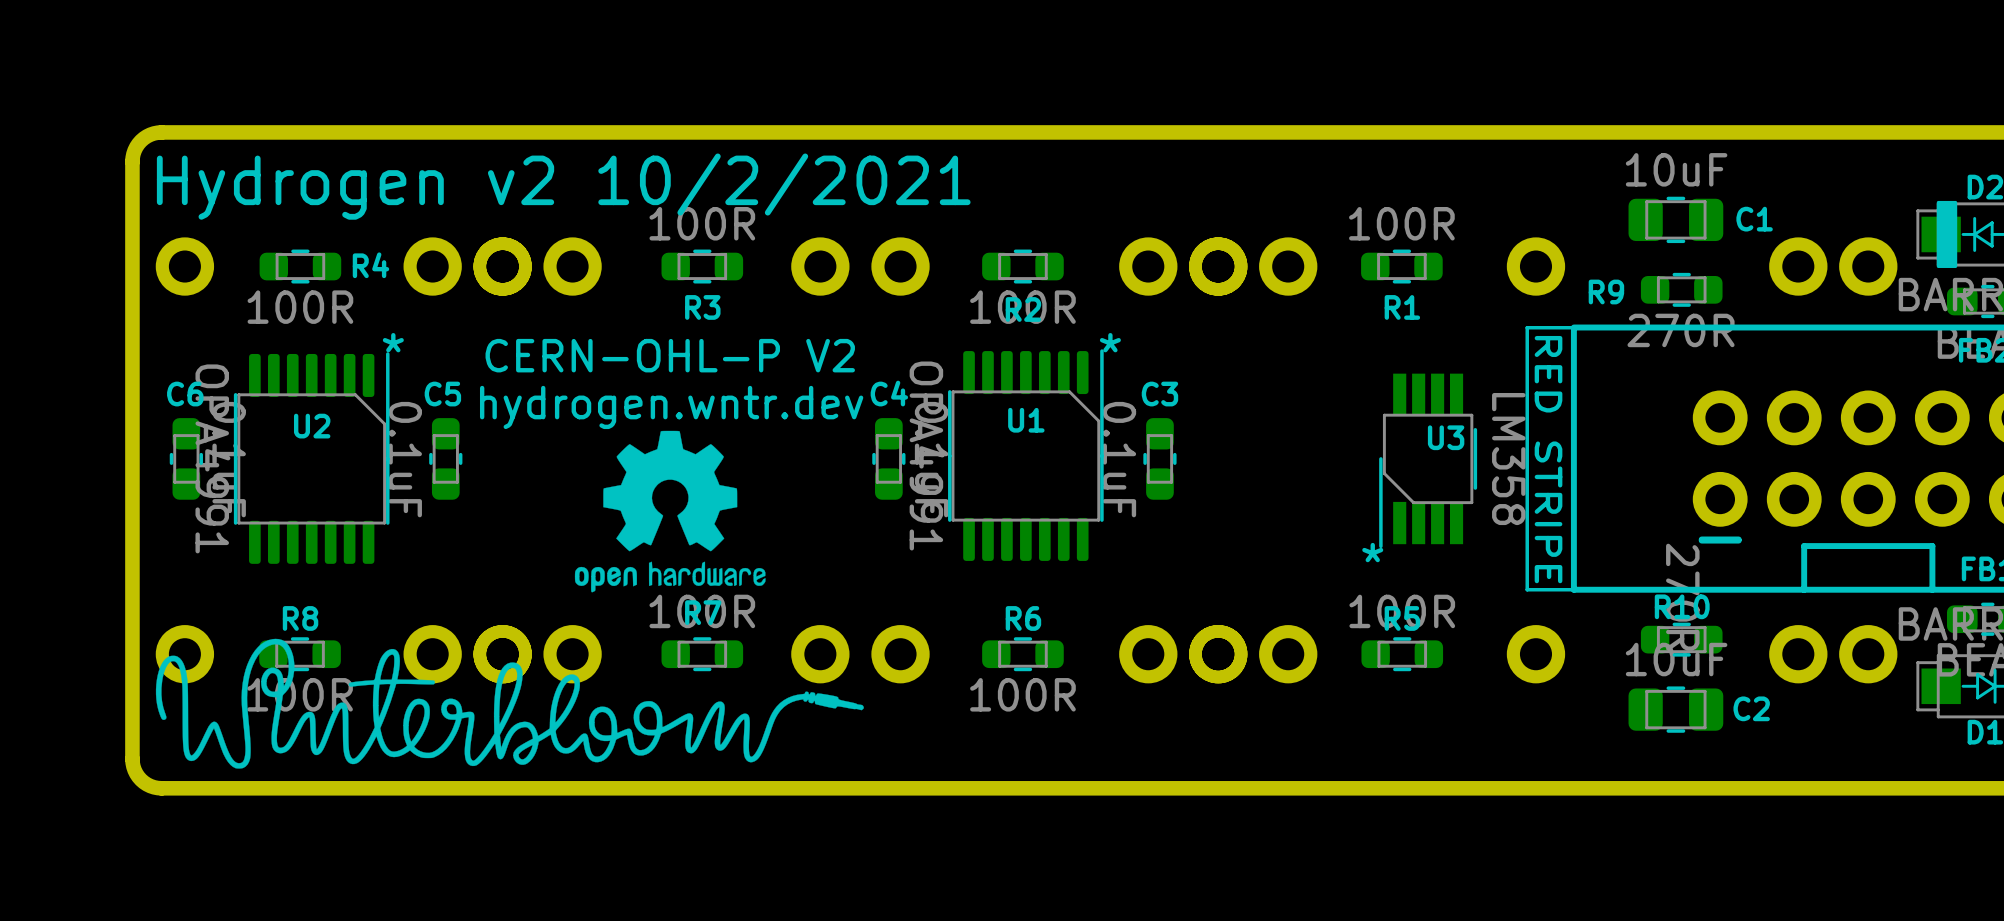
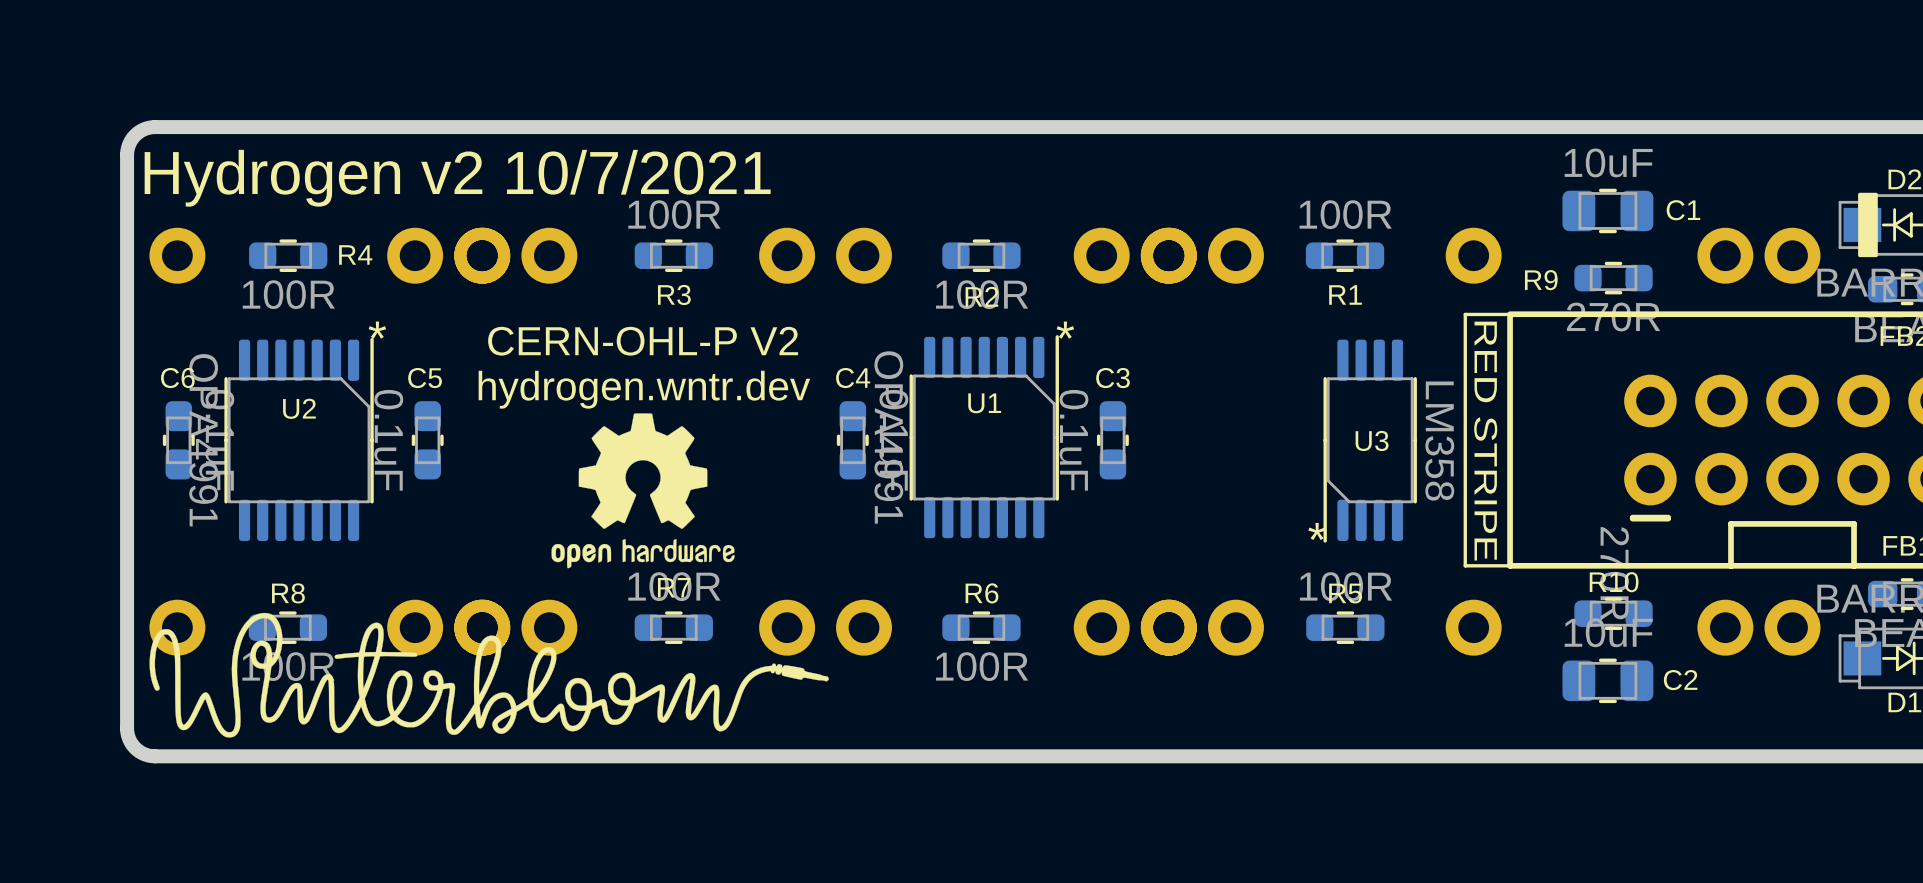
text: Hydrogen v2 10/2/2021 (563, 186) -> Hydrogen v2 10/7/2021 (457, 178)
U3 footprint: [1379, 373, 1478, 549] -> [1323, 339, 1417, 543]

